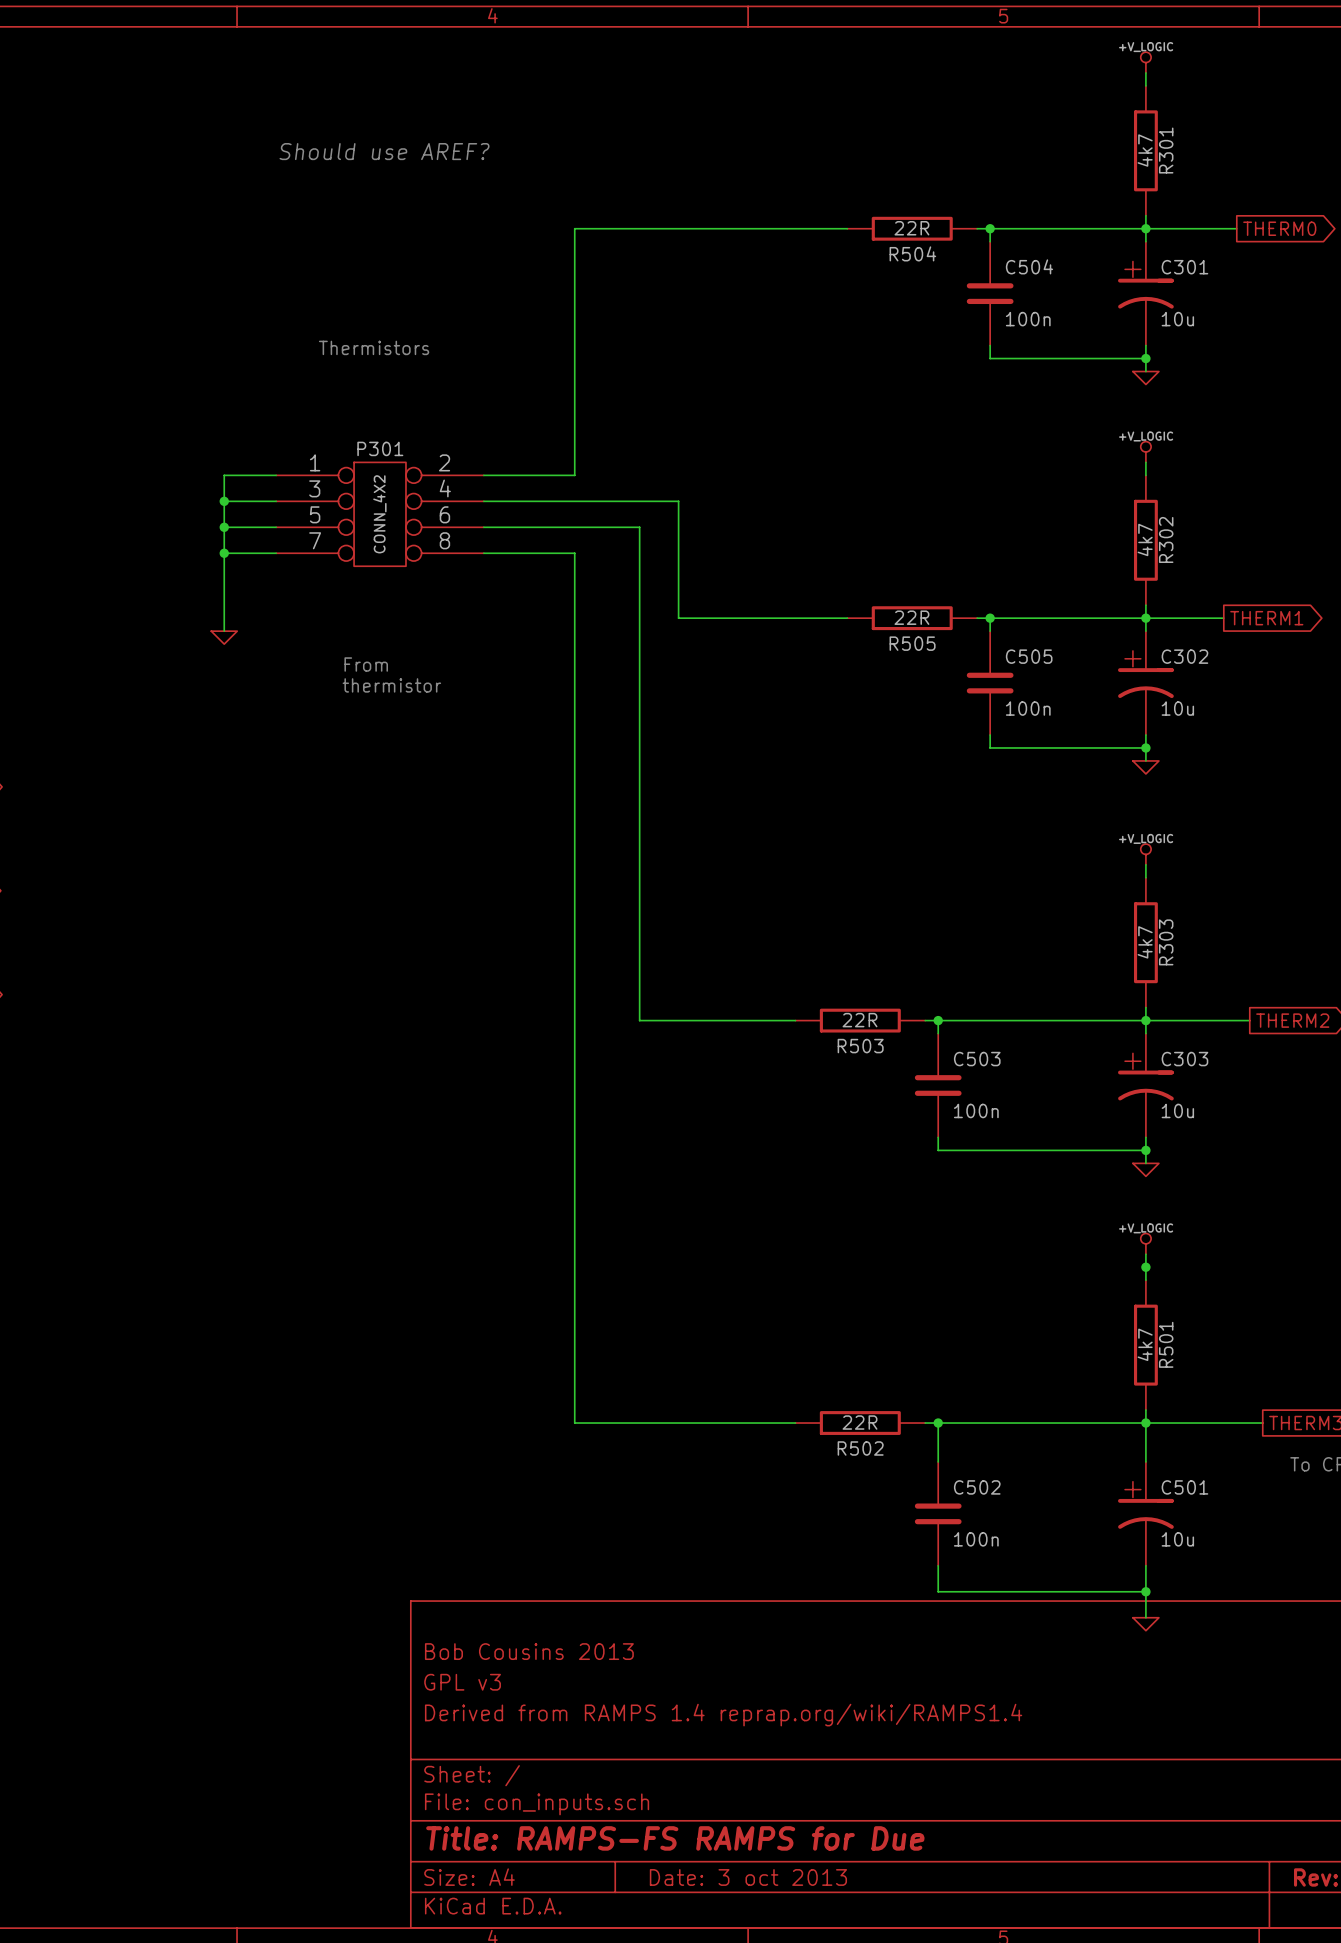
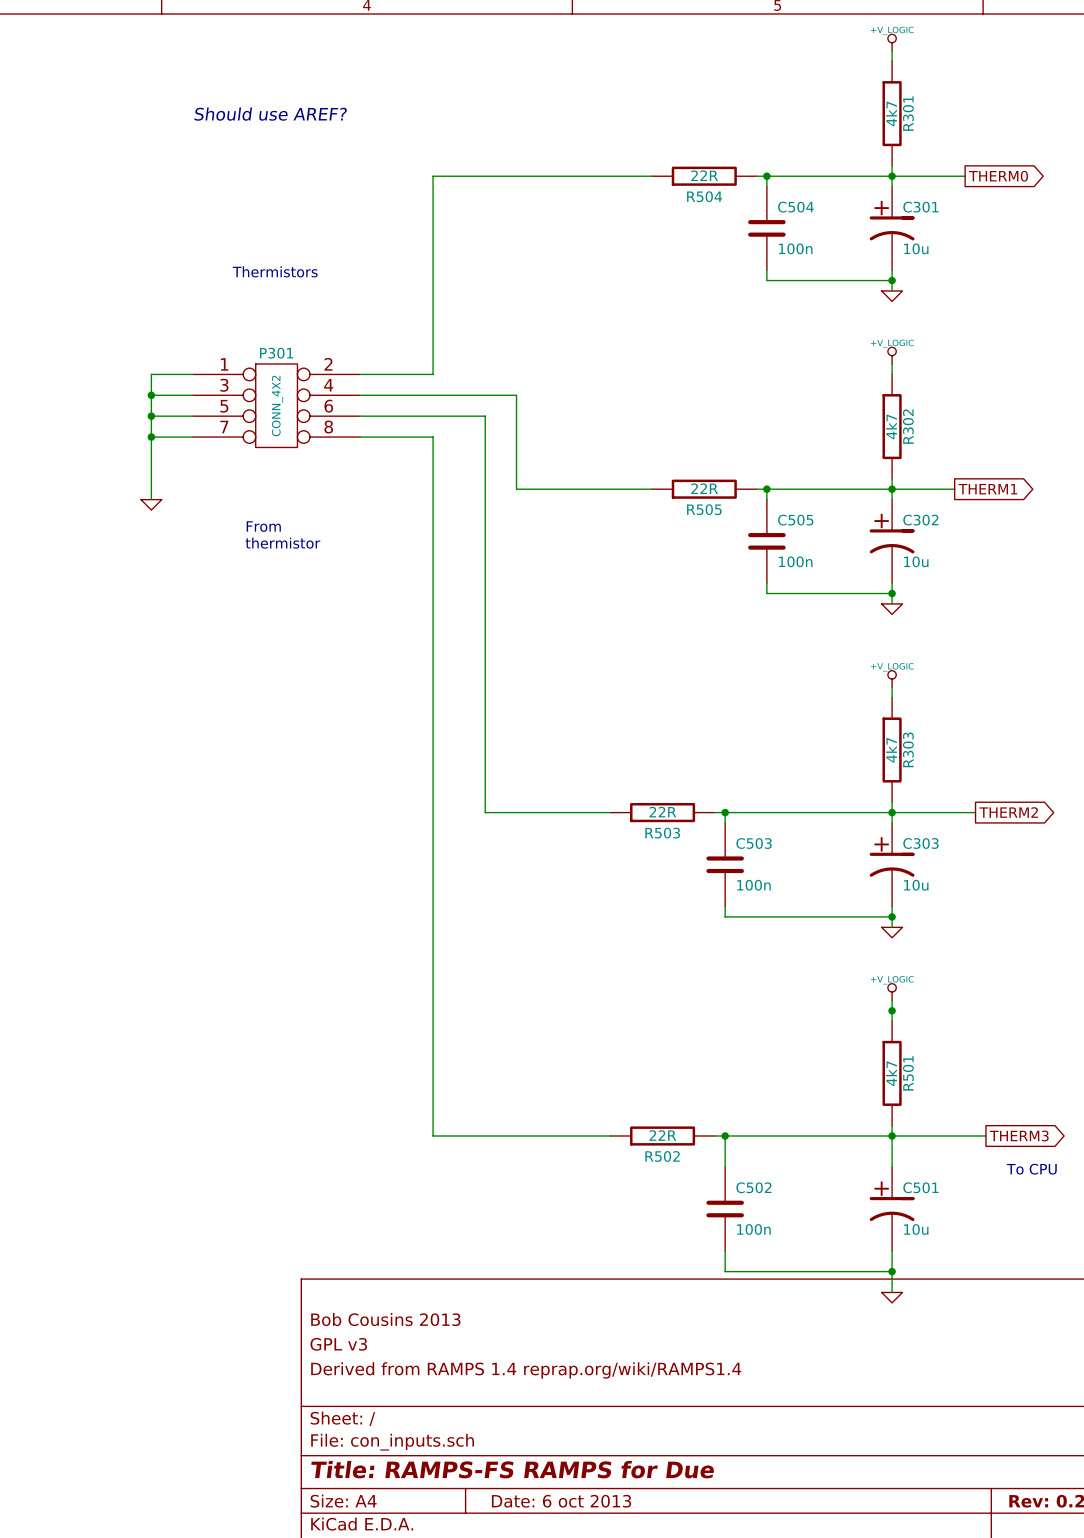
title block: Date: 3 oct 2013 (748, 1877) -> Date: 6 oct 2013 (561, 1501)

